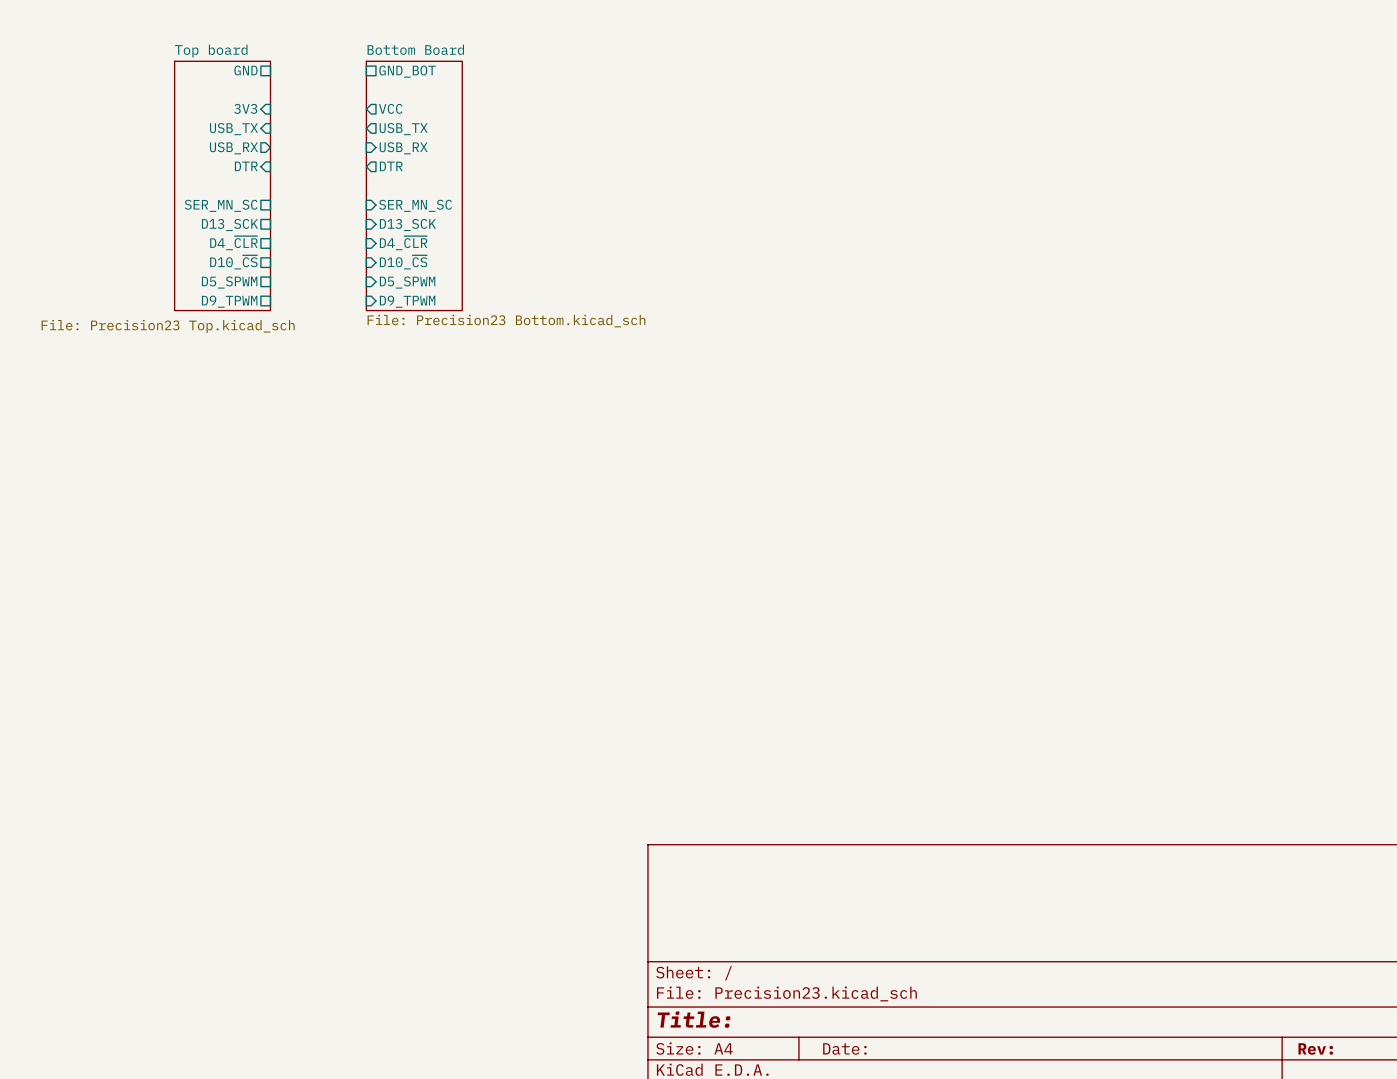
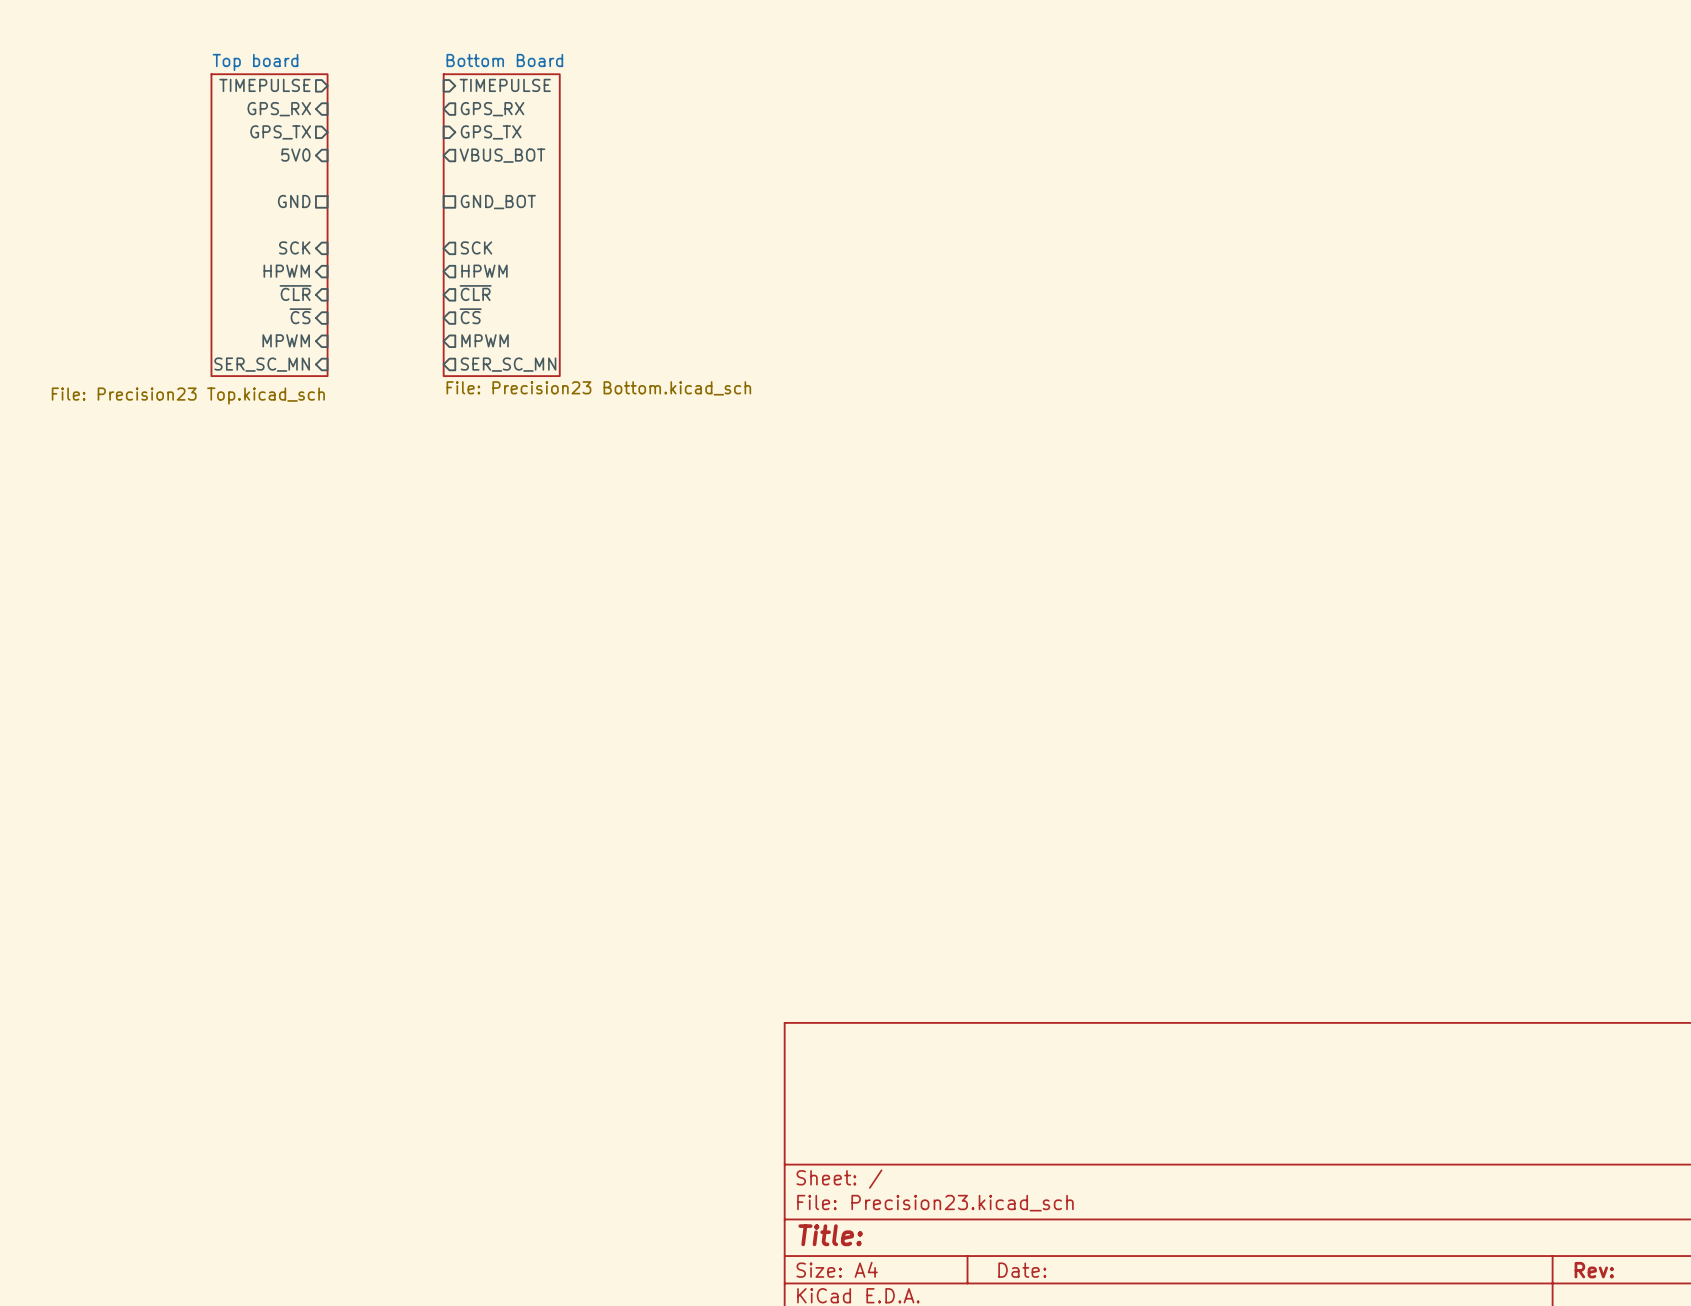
sheet pin shape: passive (245, 70) -> output (264, 85)
sheet pin: GND (245, 70) -> TIMEPULSE (264, 85)
sheet pin shape: passive (407, 71) -> input (505, 85)
sheet pin: GND_BOT (407, 71) -> TIMEPULSE (505, 85)
sheet pin: none -> GPS_RX (279, 109)
sheet pin: none -> GPS_RX (492, 109)
sheet pin shape: input (245, 108) -> output (280, 132)
sheet pin: 3V3 (245, 108) -> GPS_TX (280, 132)
sheet pin shape: output (390, 108) -> input (491, 132)
sheet pin: VCC (390, 108) -> GPS_TX (491, 132)
sheet pin: USB_TX (233, 129) -> 5V0 (295, 155)
sheet pin: USB_TX (403, 129) -> VBUS_BOT (502, 155)
sheet pin: USB_RX (233, 148) -> none
sheet pin: USB_RX (403, 148) -> none
sheet pin shape: input (246, 166) -> passive (294, 201)
sheet pin: DTR (246, 166) -> GND (294, 201)
sheet pin shape: output (391, 166) -> passive (498, 202)
sheet pin: DTR (391, 166) -> GND_BOT (498, 202)
sheet pin shape: passive (221, 205) -> input (294, 247)
sheet pin: SER_MN_SC (221, 205) -> SCK (294, 247)
sheet pin shape: input (415, 205) -> output (476, 247)
sheet pin: SER_MN_SC (415, 205) -> SCK (476, 247)
sheet pin shape: passive (229, 225) -> input (286, 271)
sheet pin: D13_SCK (229, 225) -> HPWM (286, 271)
sheet pin shape: input (407, 225) -> output (484, 271)
sheet pin: D13_SCK (407, 225) -> HPWM (484, 271)
sheet pin shape: passive (233, 243) -> input (295, 293)
sheet pin: D4_~{CLR} (233, 243) -> ~{CLR} (295, 293)
sheet pin shape: input (403, 243) -> output (475, 293)
sheet pin: D4_~{CLR} (403, 243) -> ~{CLR} (475, 293)
sheet pin shape: passive (233, 262) -> input (300, 316)
sheet pin: D10_~{CS} (233, 262) -> ~{CS} (300, 316)
sheet pin shape: input (403, 262) -> output (470, 316)
sheet pin: D10_~{CS} (403, 262) -> ~{CS} (470, 316)
sheet pin shape: passive (229, 282) -> input (286, 340)
sheet pin: D5_SPWM (229, 282) -> MPWM (286, 340)
sheet pin shape: input (407, 282) -> output (485, 340)
sheet pin: D5_SPWM (407, 282) -> MPWM (485, 340)
sheet pin shape: passive (229, 301) -> input (262, 364)
sheet pin: D9_TPWM (229, 301) -> SER_SC_MN (262, 364)
sheet pin shape: input (407, 301) -> output (508, 364)
sheet pin: D9_TPWM (407, 301) -> SER_SC_MN (508, 364)

